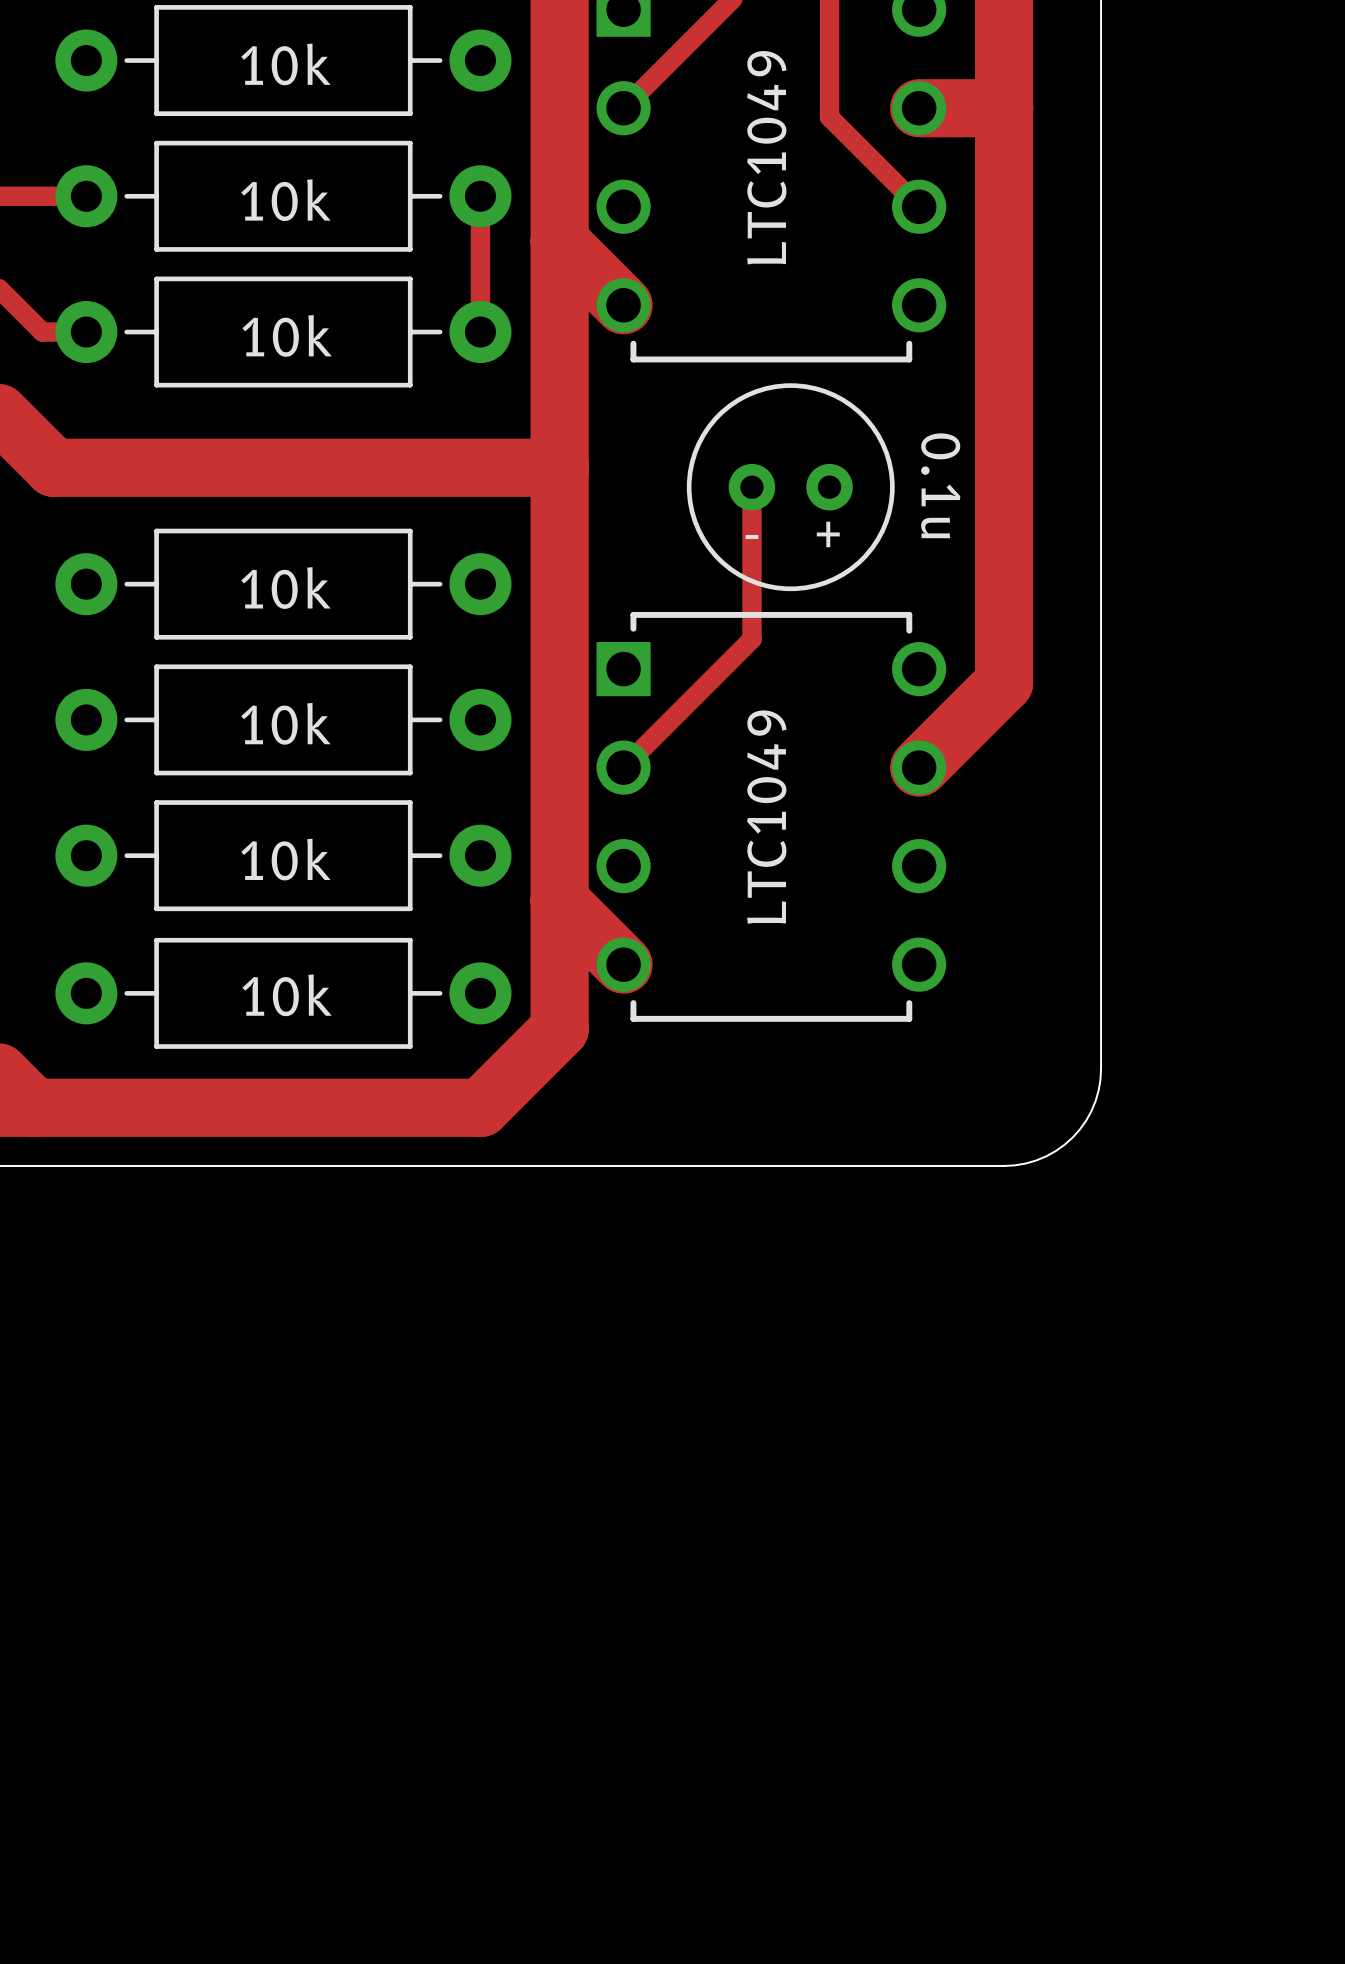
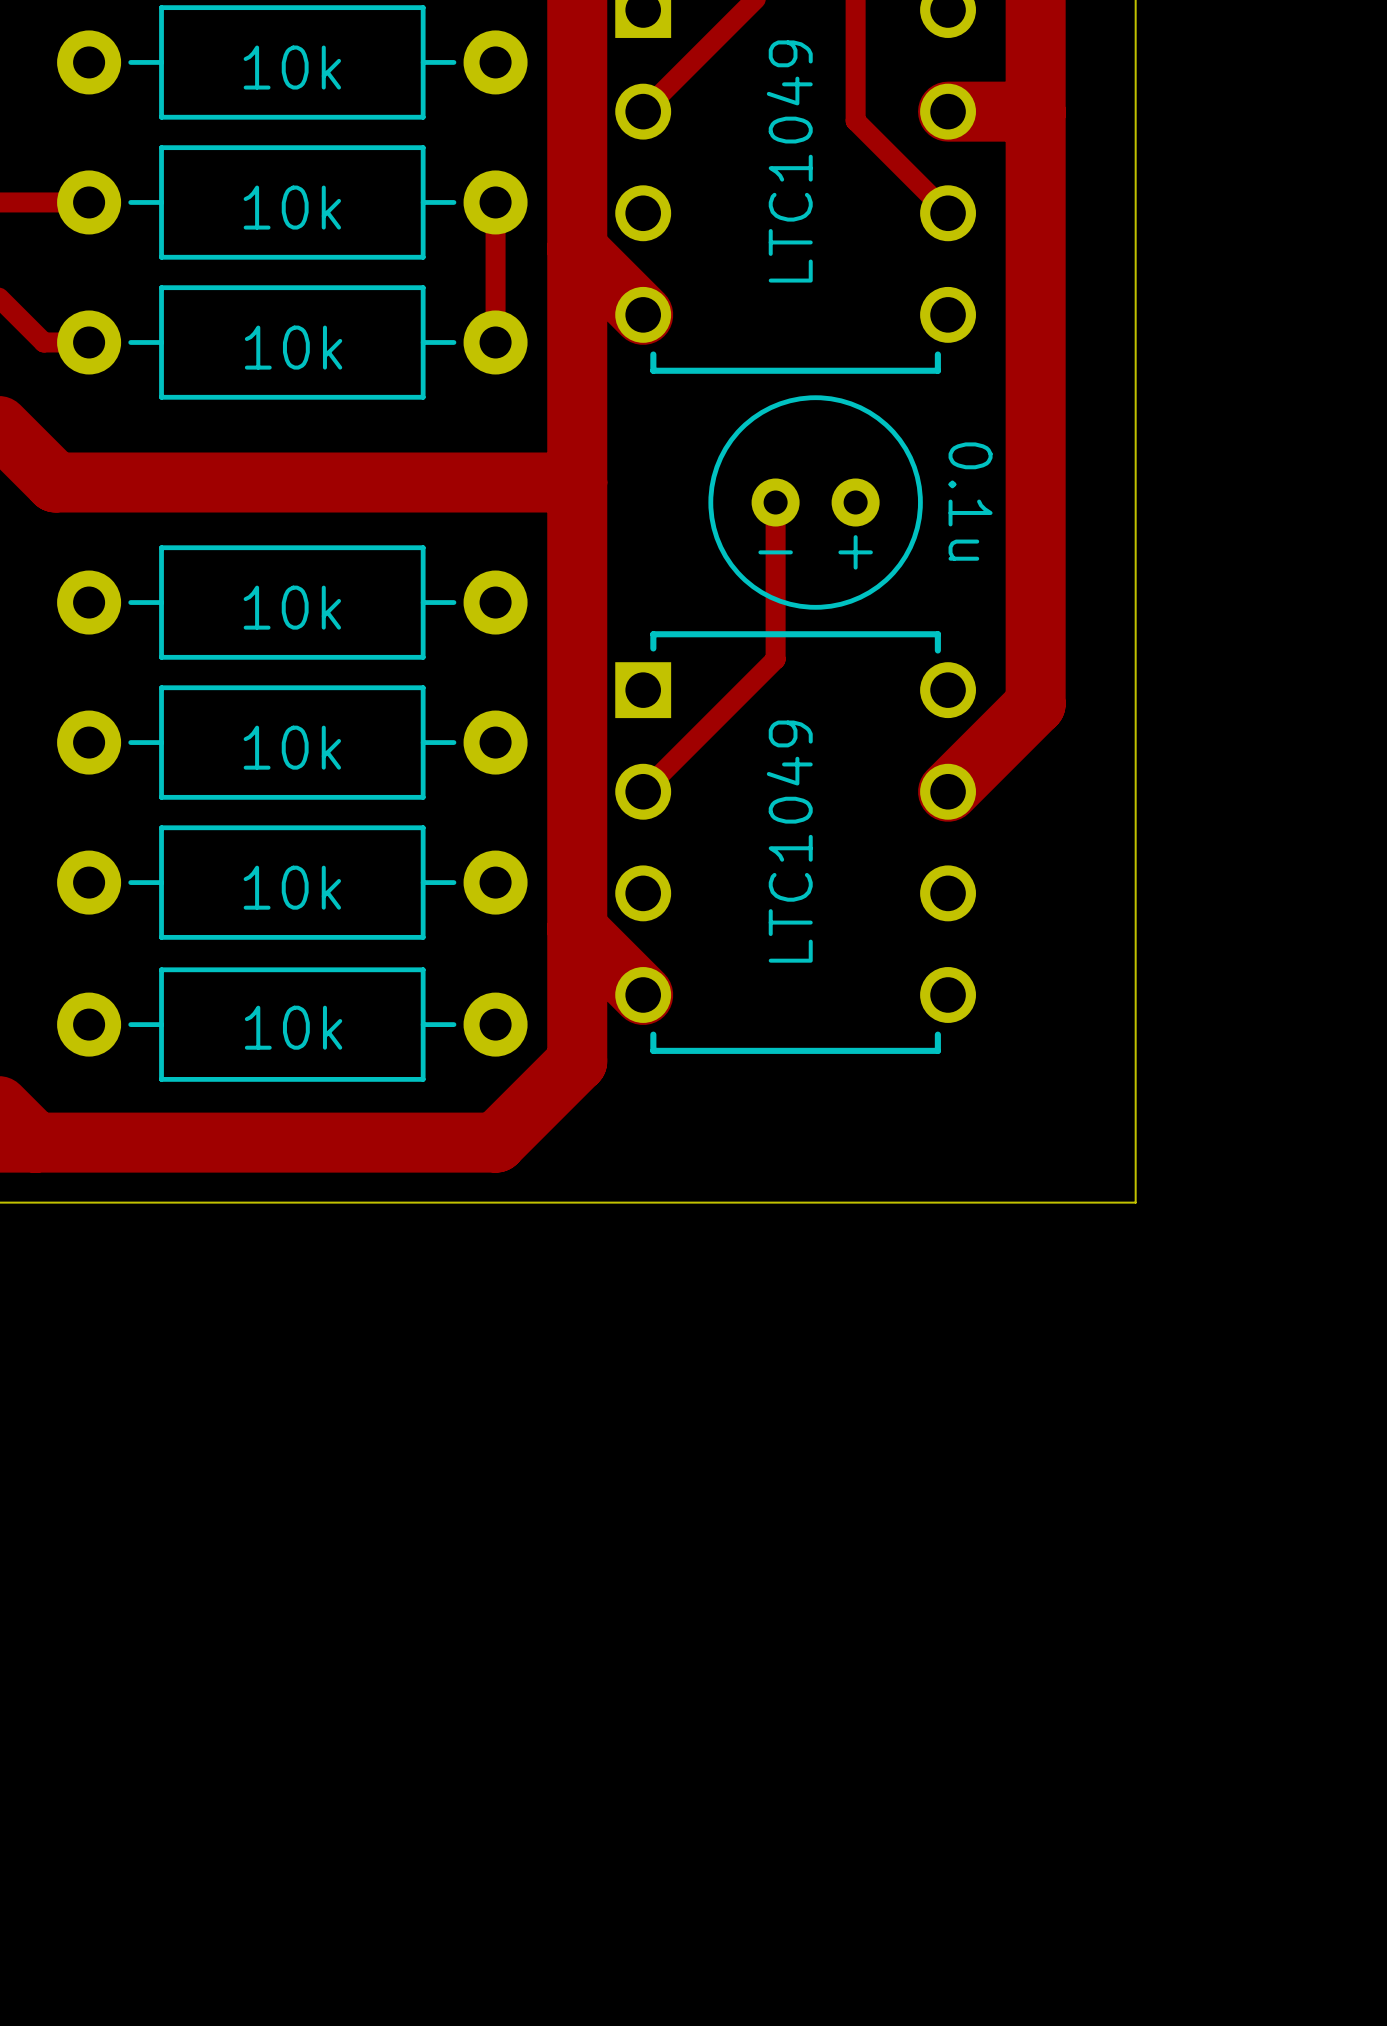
board edge: (1101, 1069) (1095, 1101) (1086, 1120) (1072, 1137) (1046, 1156) (1025, 1163) (1004, 1165) -> (1135, 1102) (1135, 1202) (1035, 1202)

